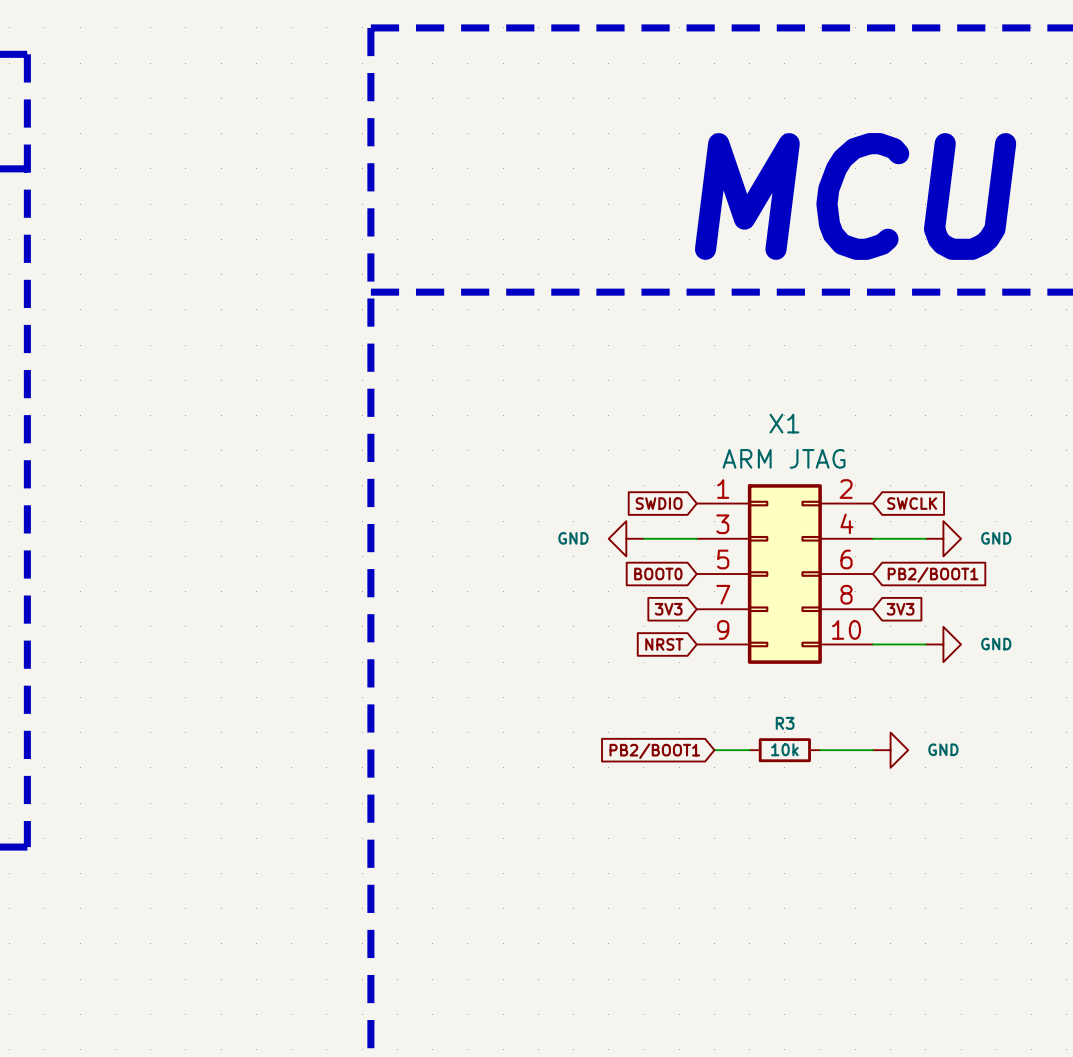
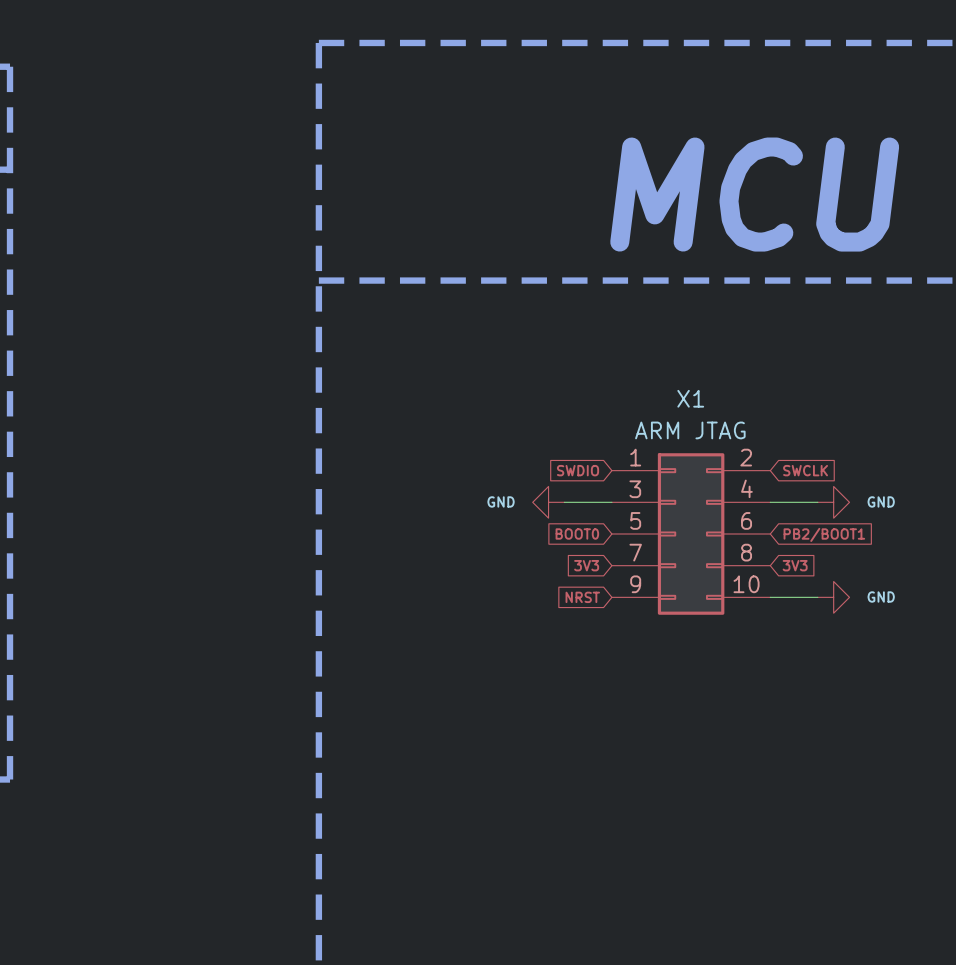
wire: (714, 750) (749, 750) -> none
R3: 10k (784, 750) -> none
wire: (820, 750) (872, 750) -> none
power symbol: GND (890, 750) -> none
global label: PB2/BOOT1 (654, 751) -> none

